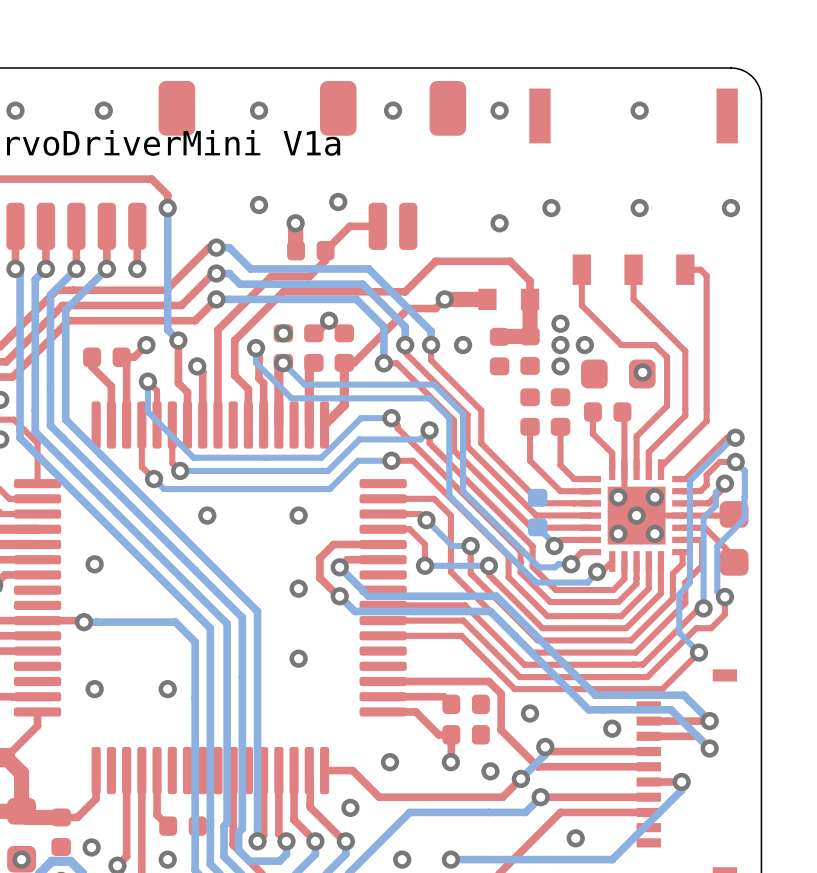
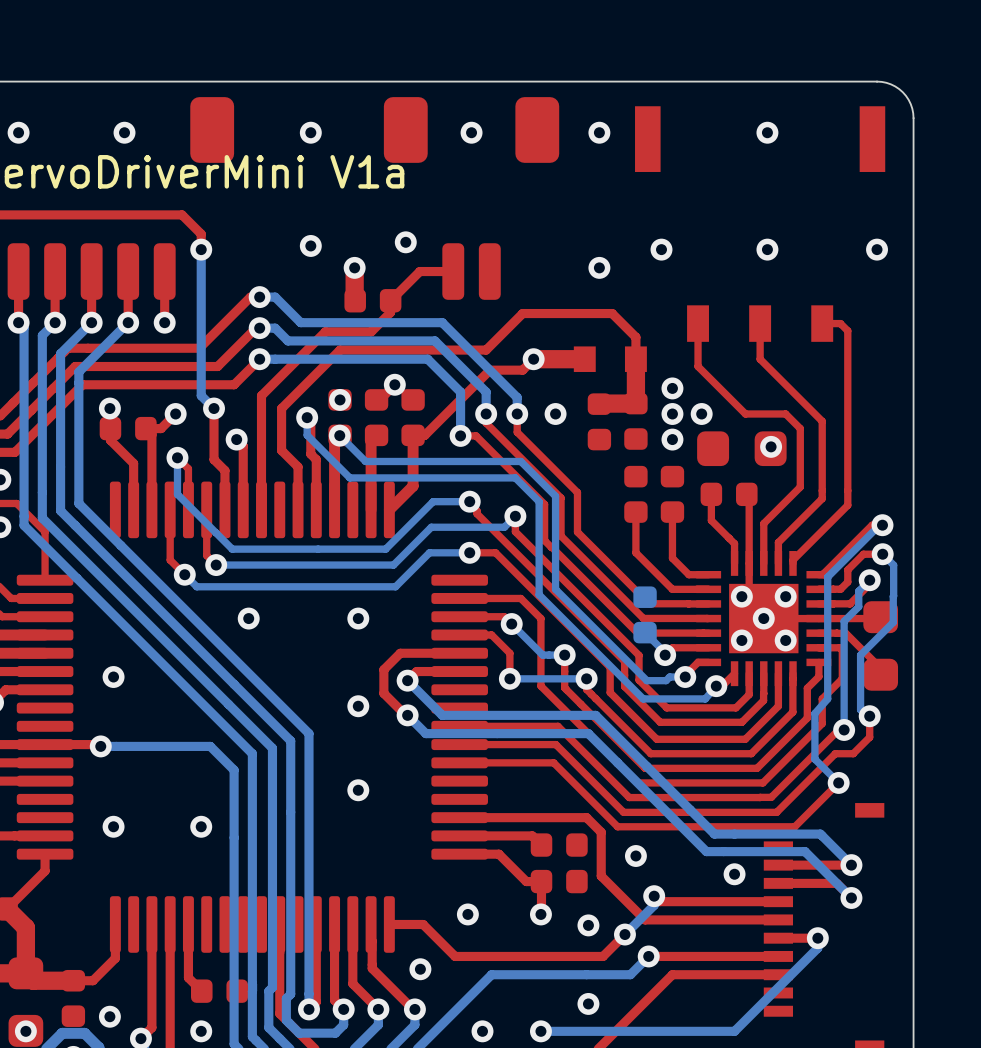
via: none -> (109, 408)
via: none -> (588, 1003)
via: (575, 838) -> none

